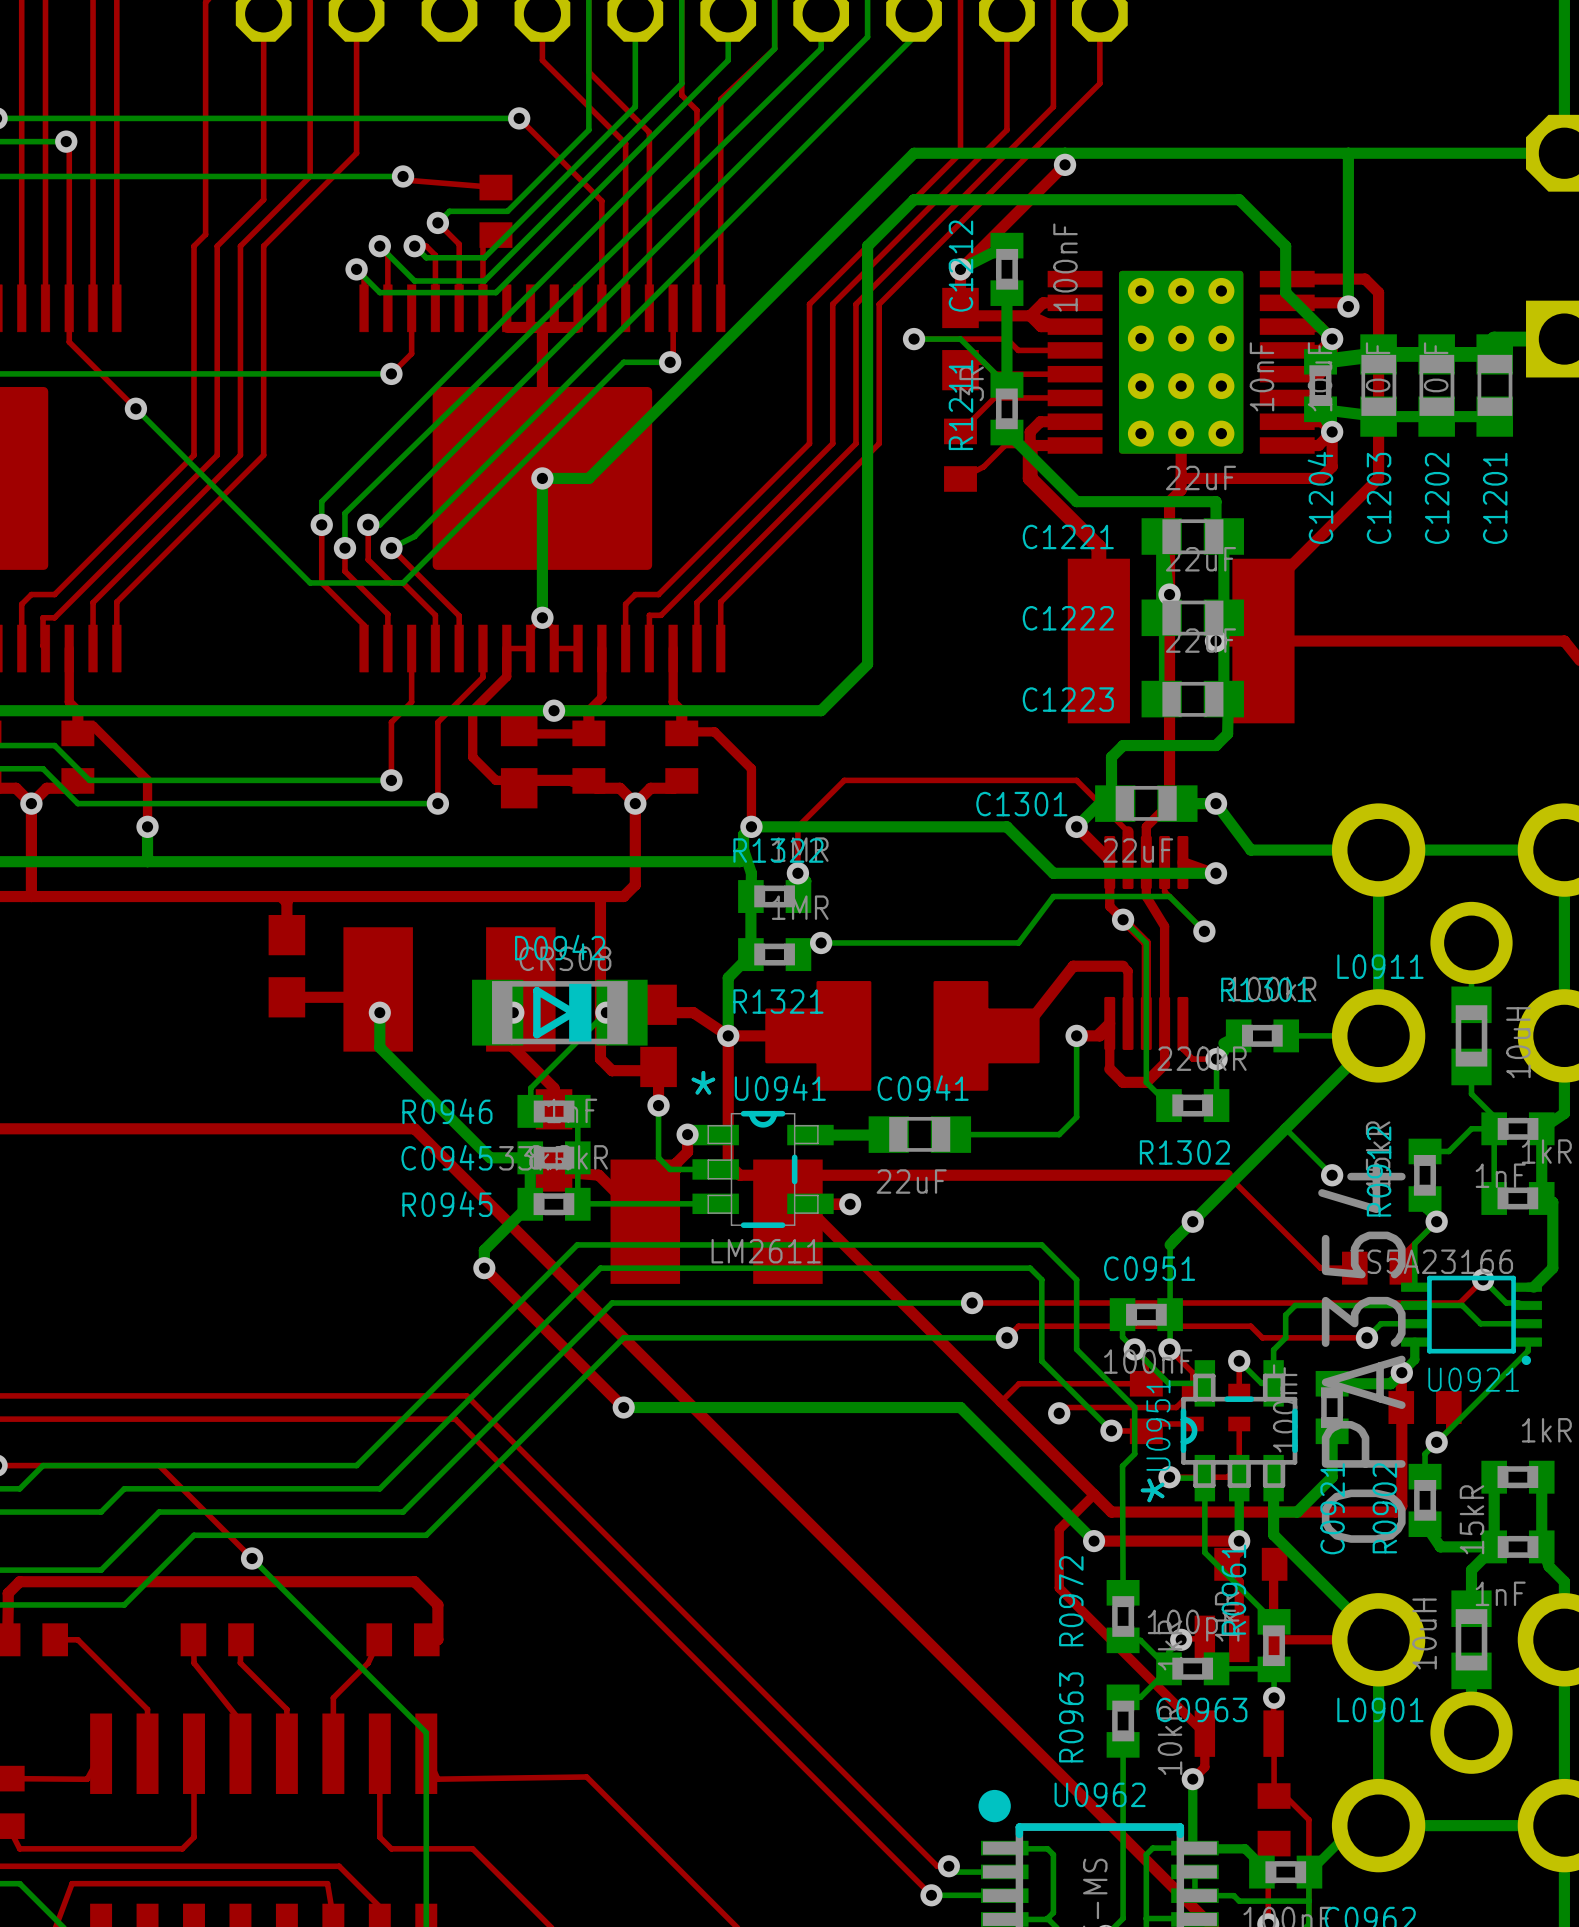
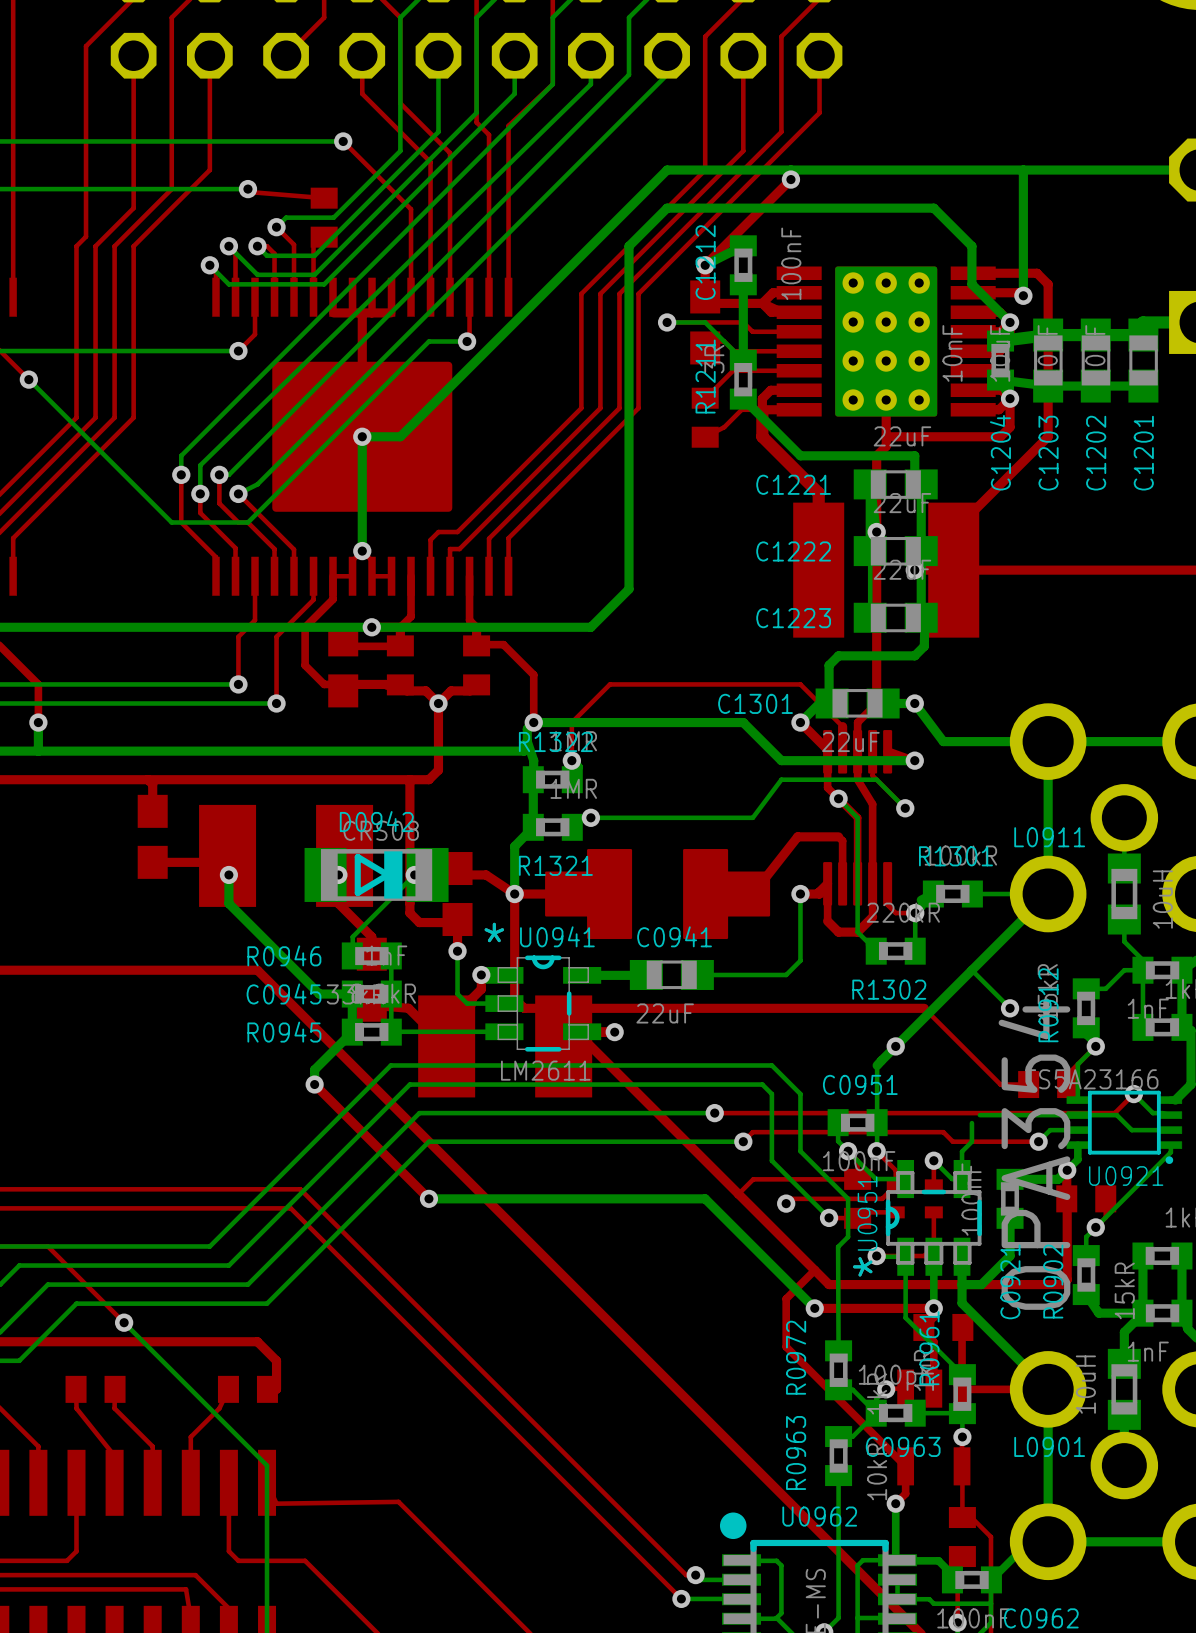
bottom track: (1295, 1305) (1285, 1315) -> none

